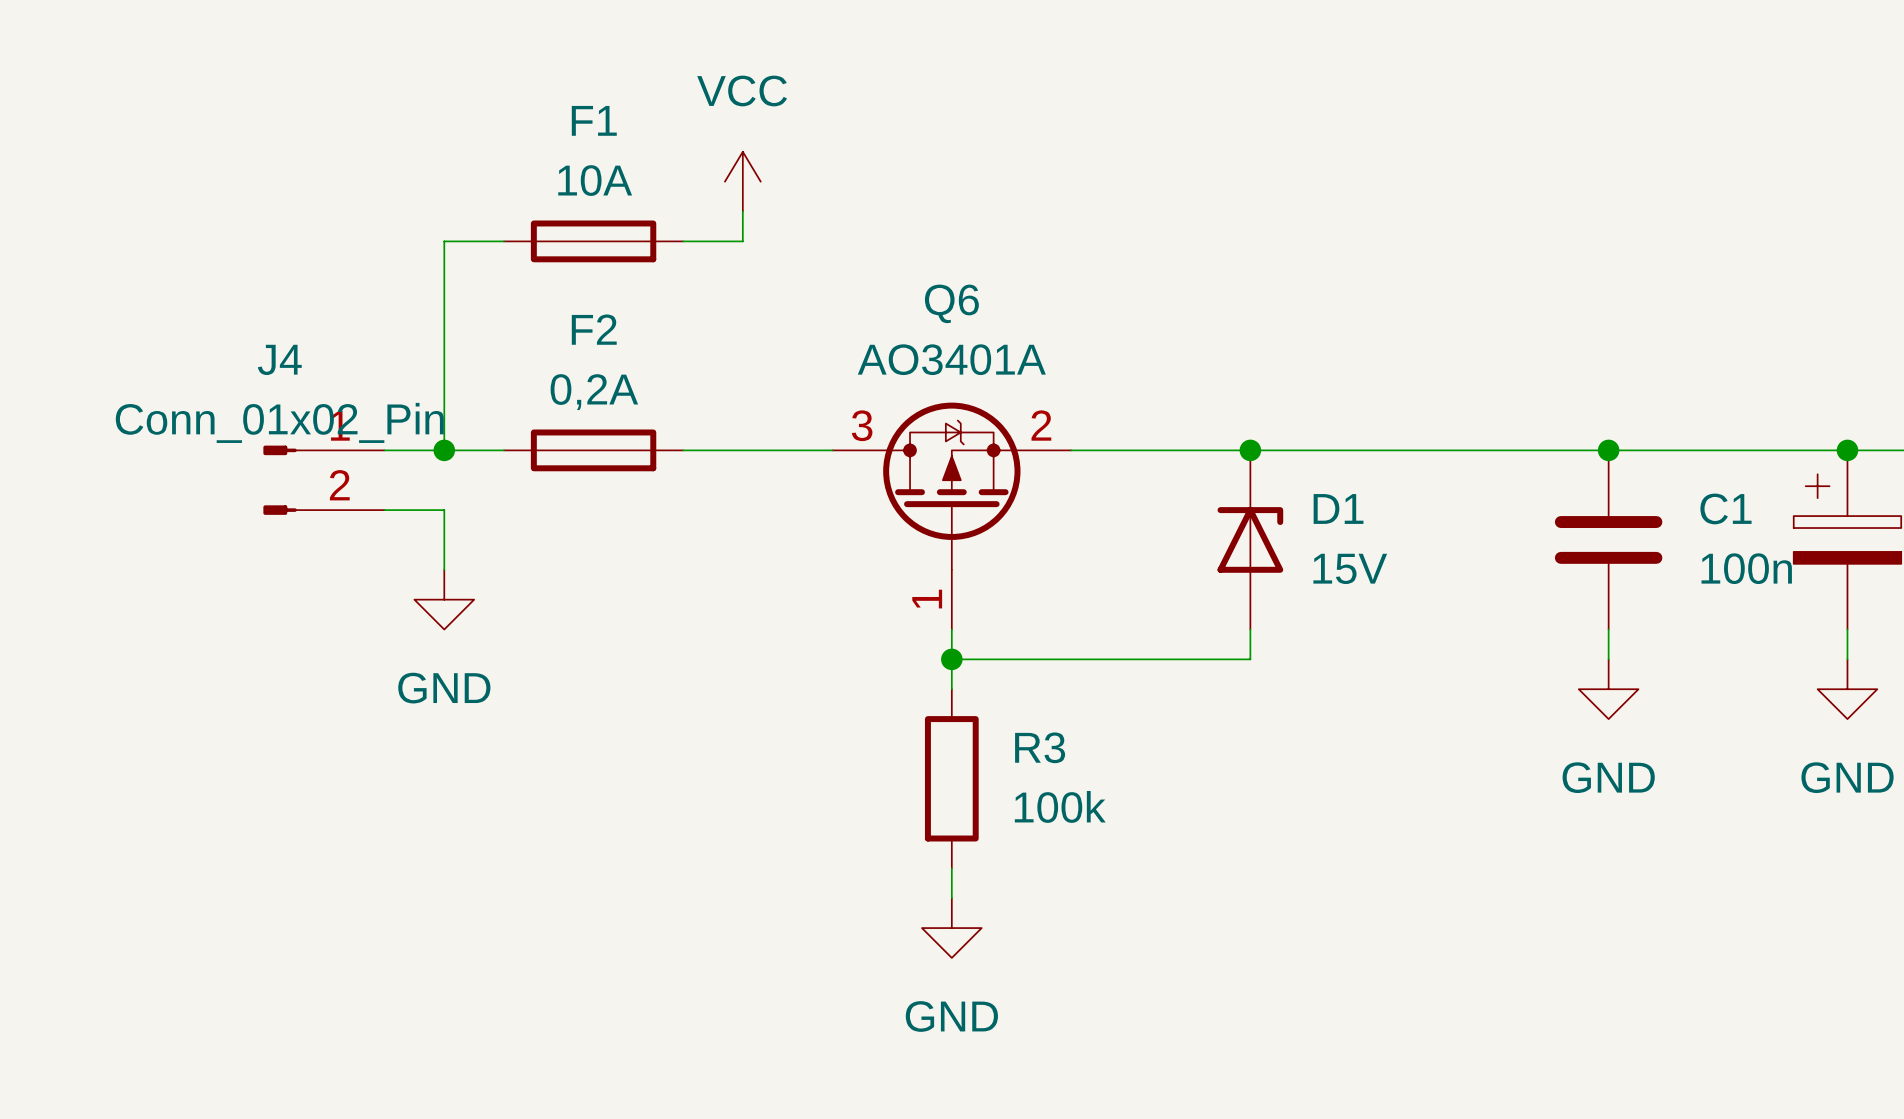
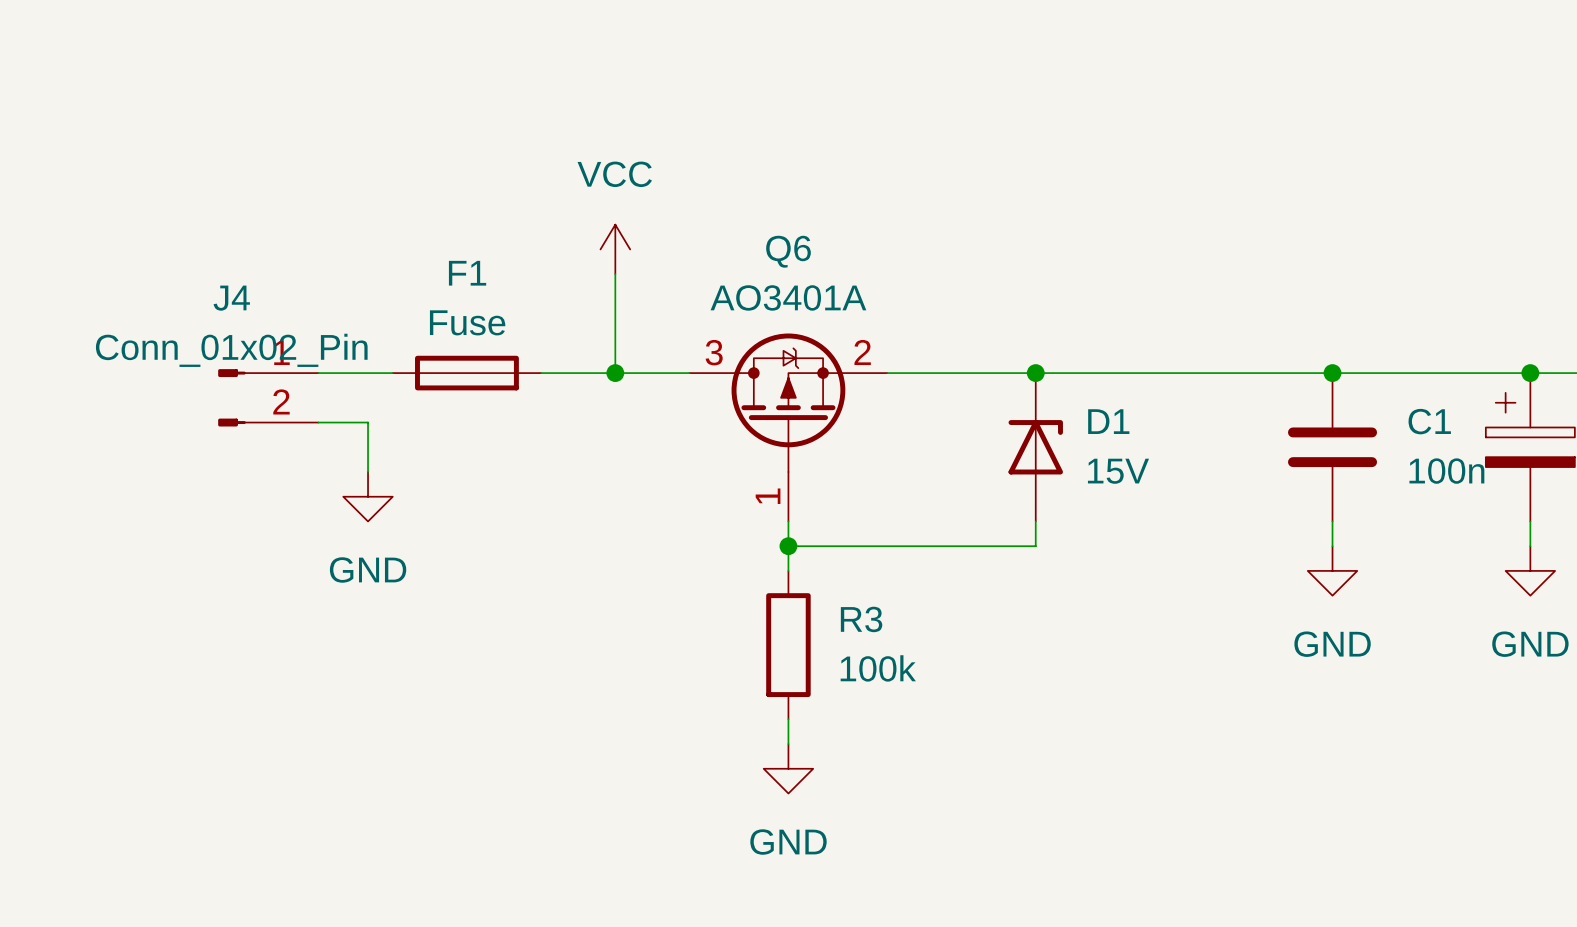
F1 value: 10A (595, 180) -> Fuse (467, 322)
power symbol position: VCC (742, 181) -> VCC (615, 249)
wire: (742, 211) (742, 241) (683, 241) -> none
wire: (504, 241) (444, 241) (444, 450) -> none
F1 position: (593, 241) -> (466, 373)
wire: none -> (615, 274) (615, 373)
junction: (444, 450) -> none
F2: 0,2A (593, 450) -> none
junction: none -> (615, 373)

